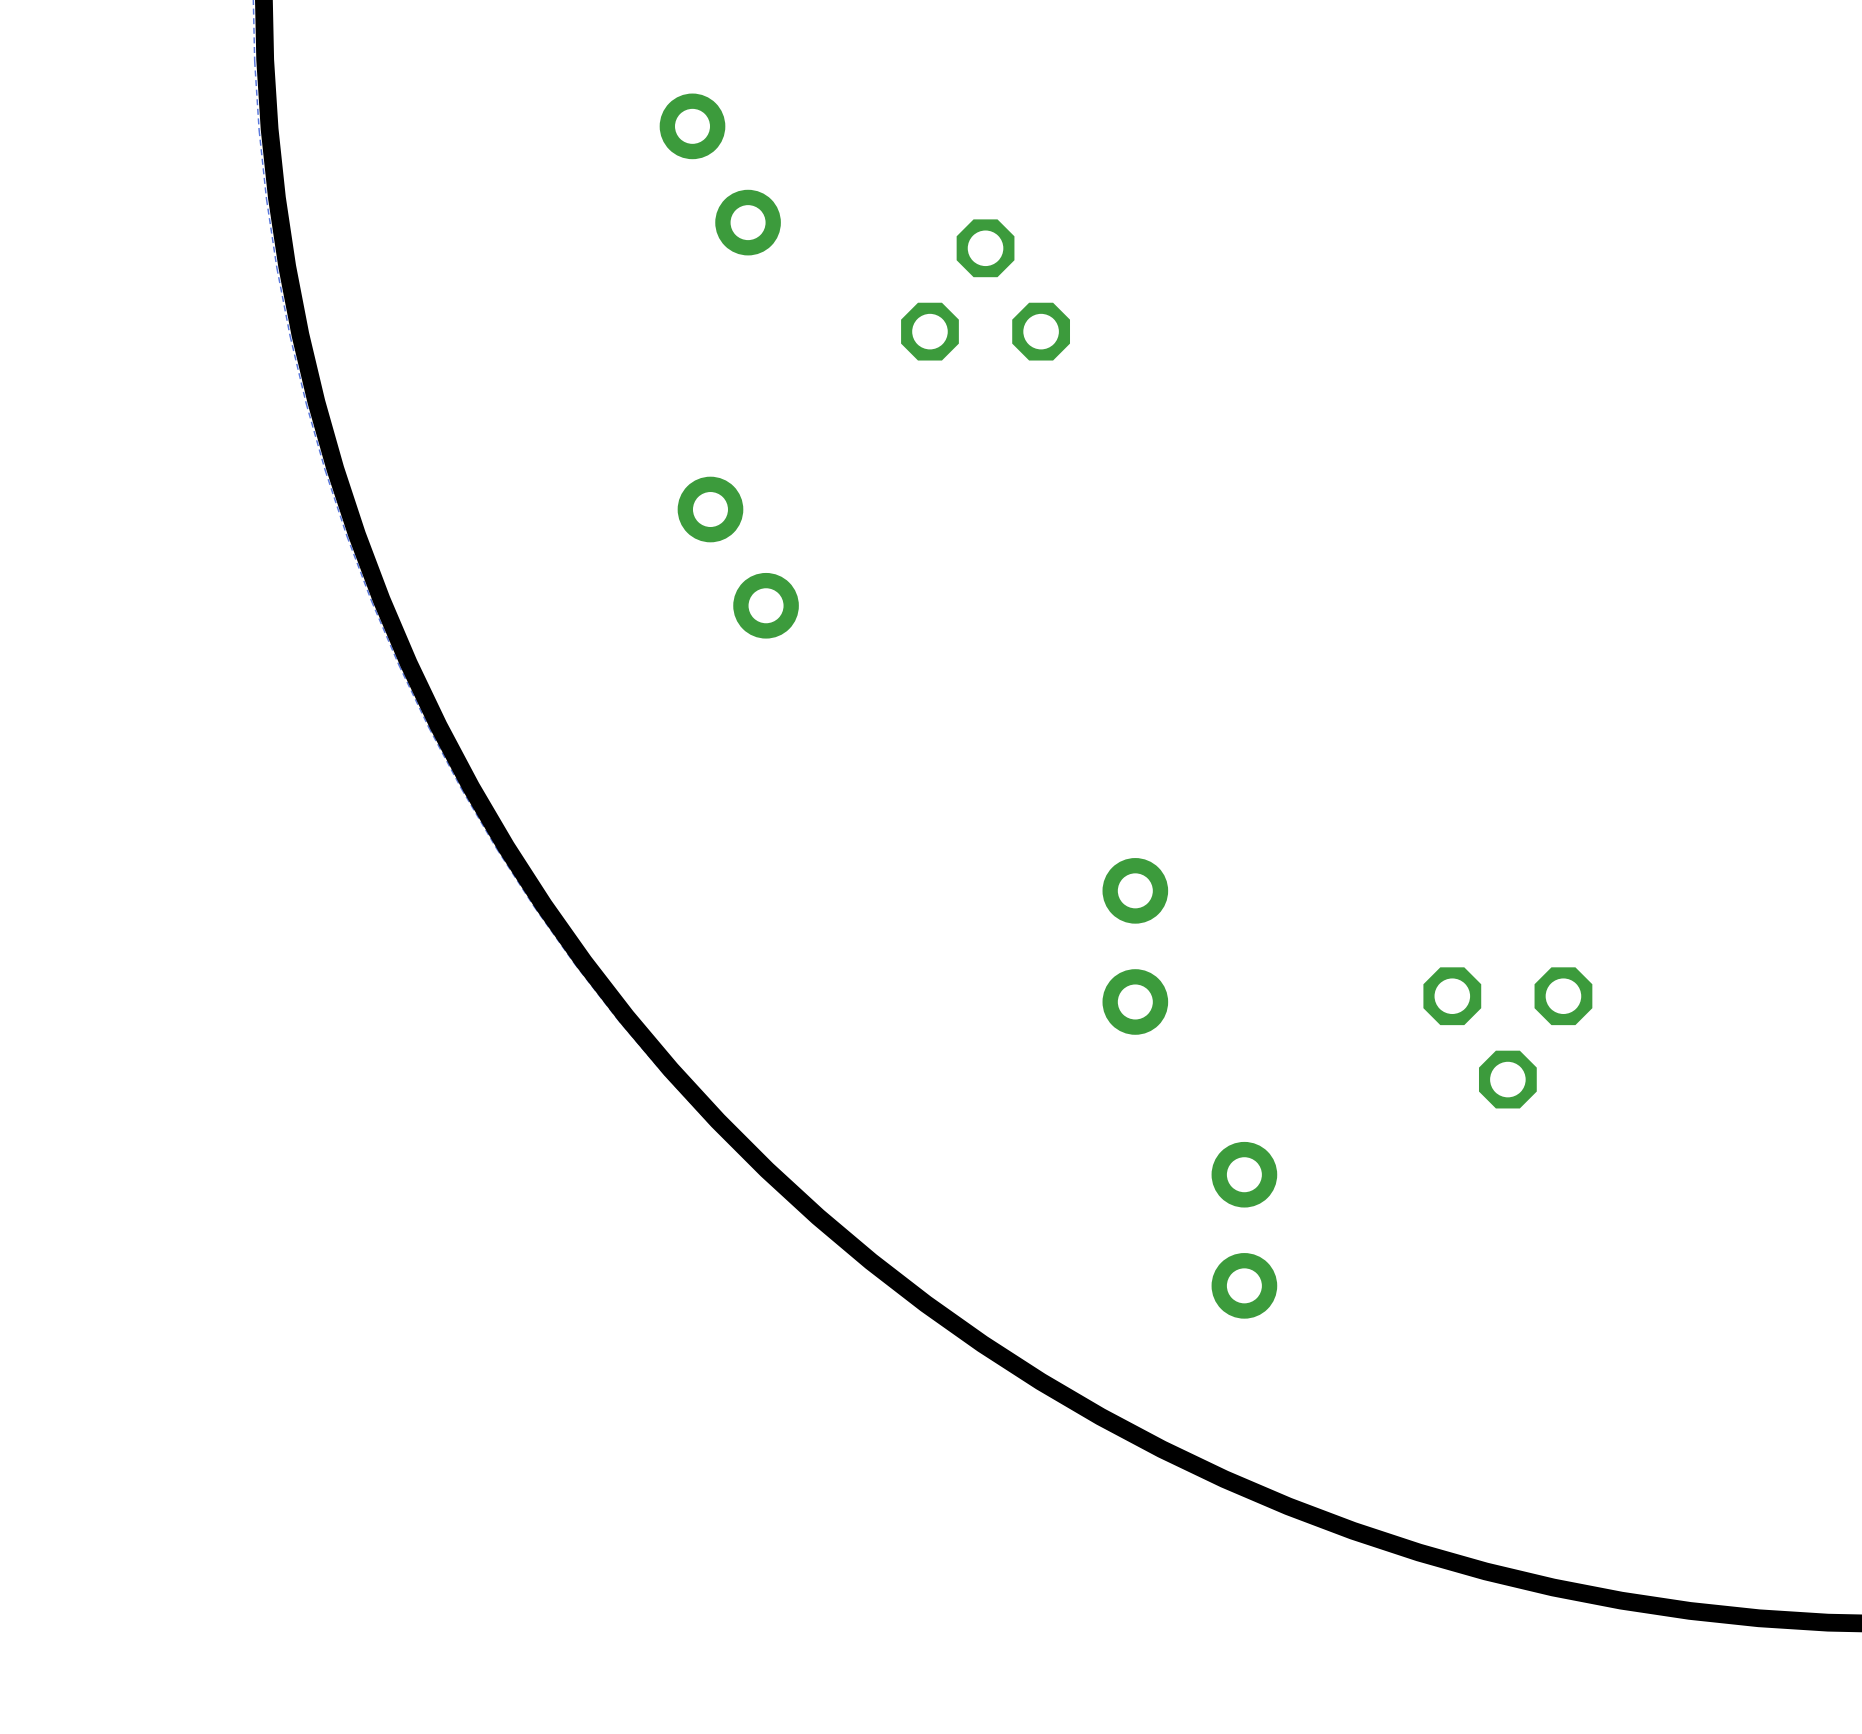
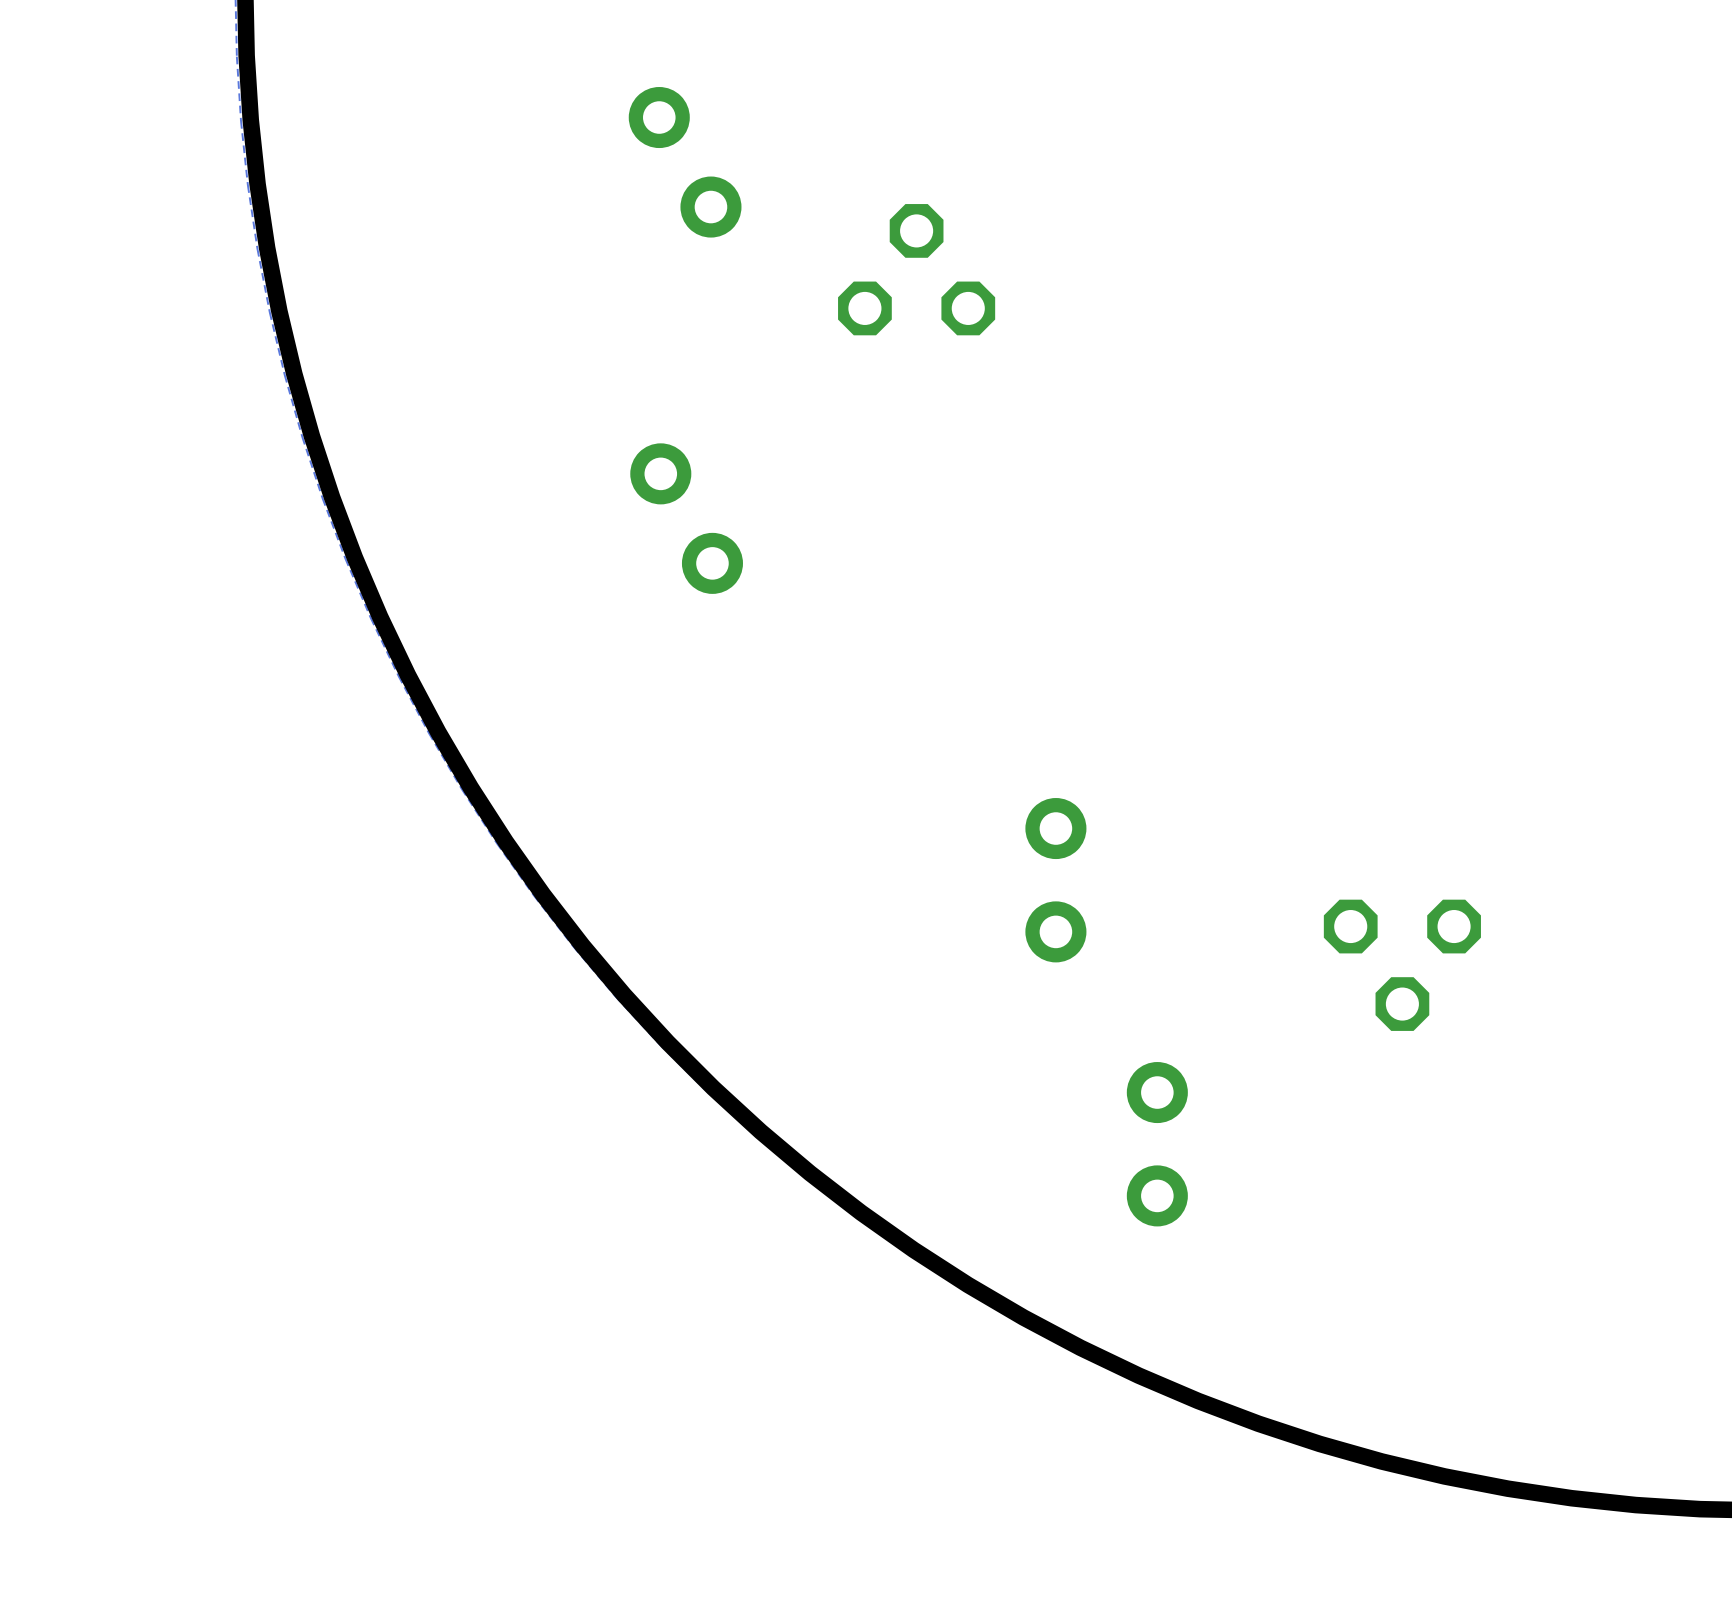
part position: (720, 174) -> (685, 162)

